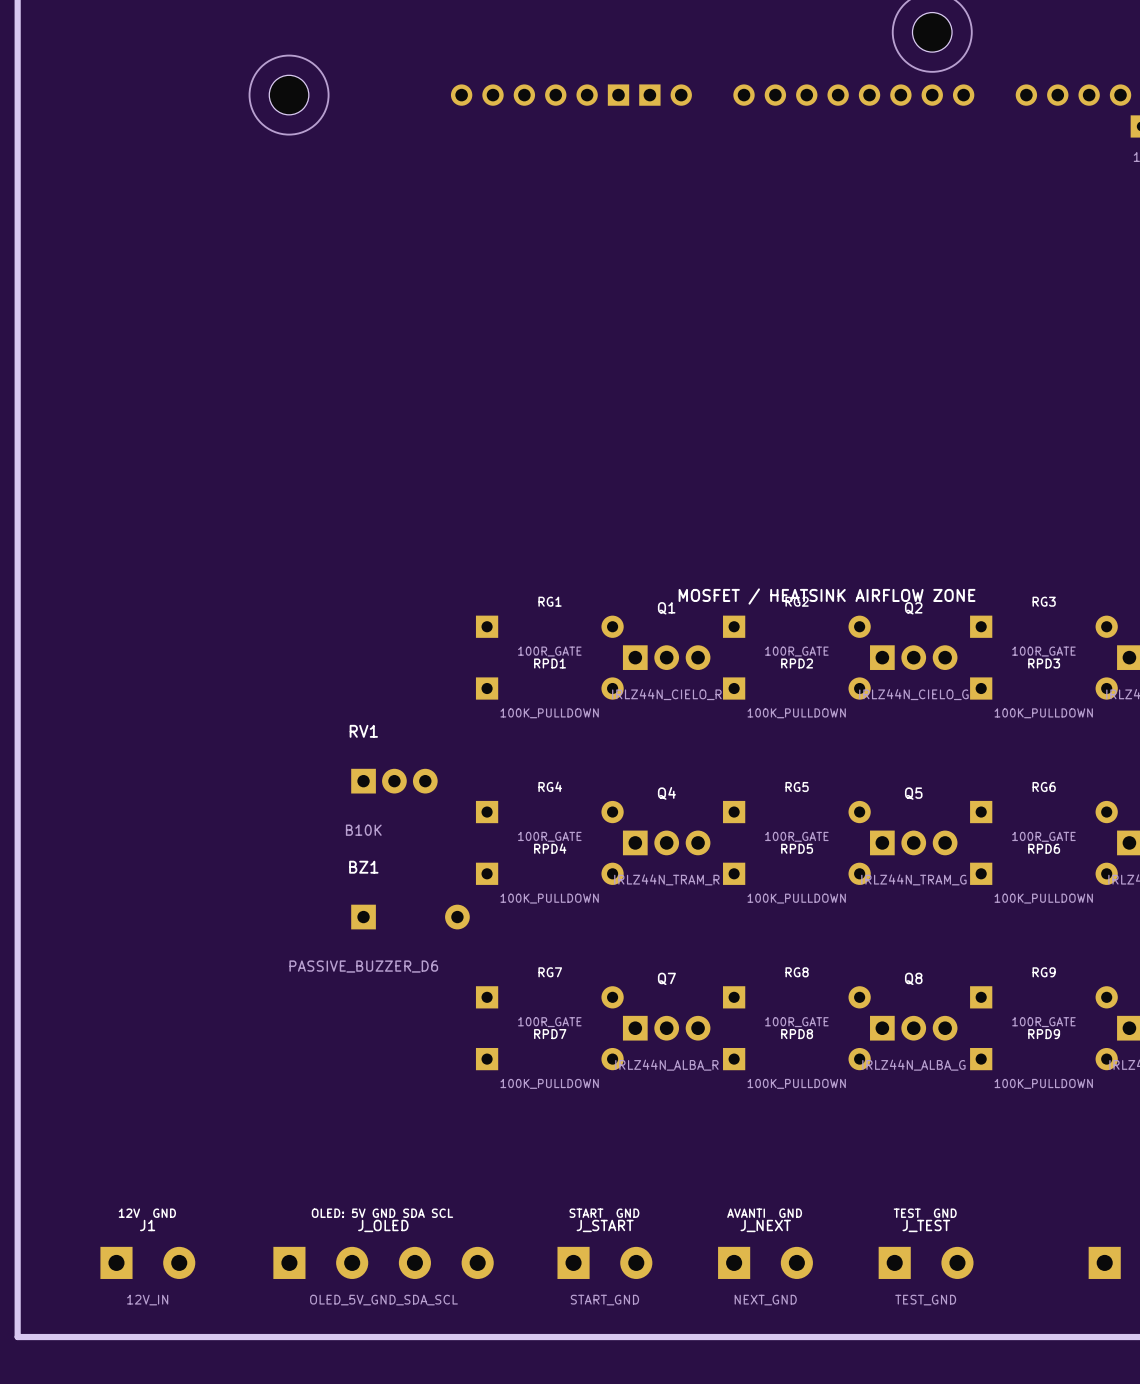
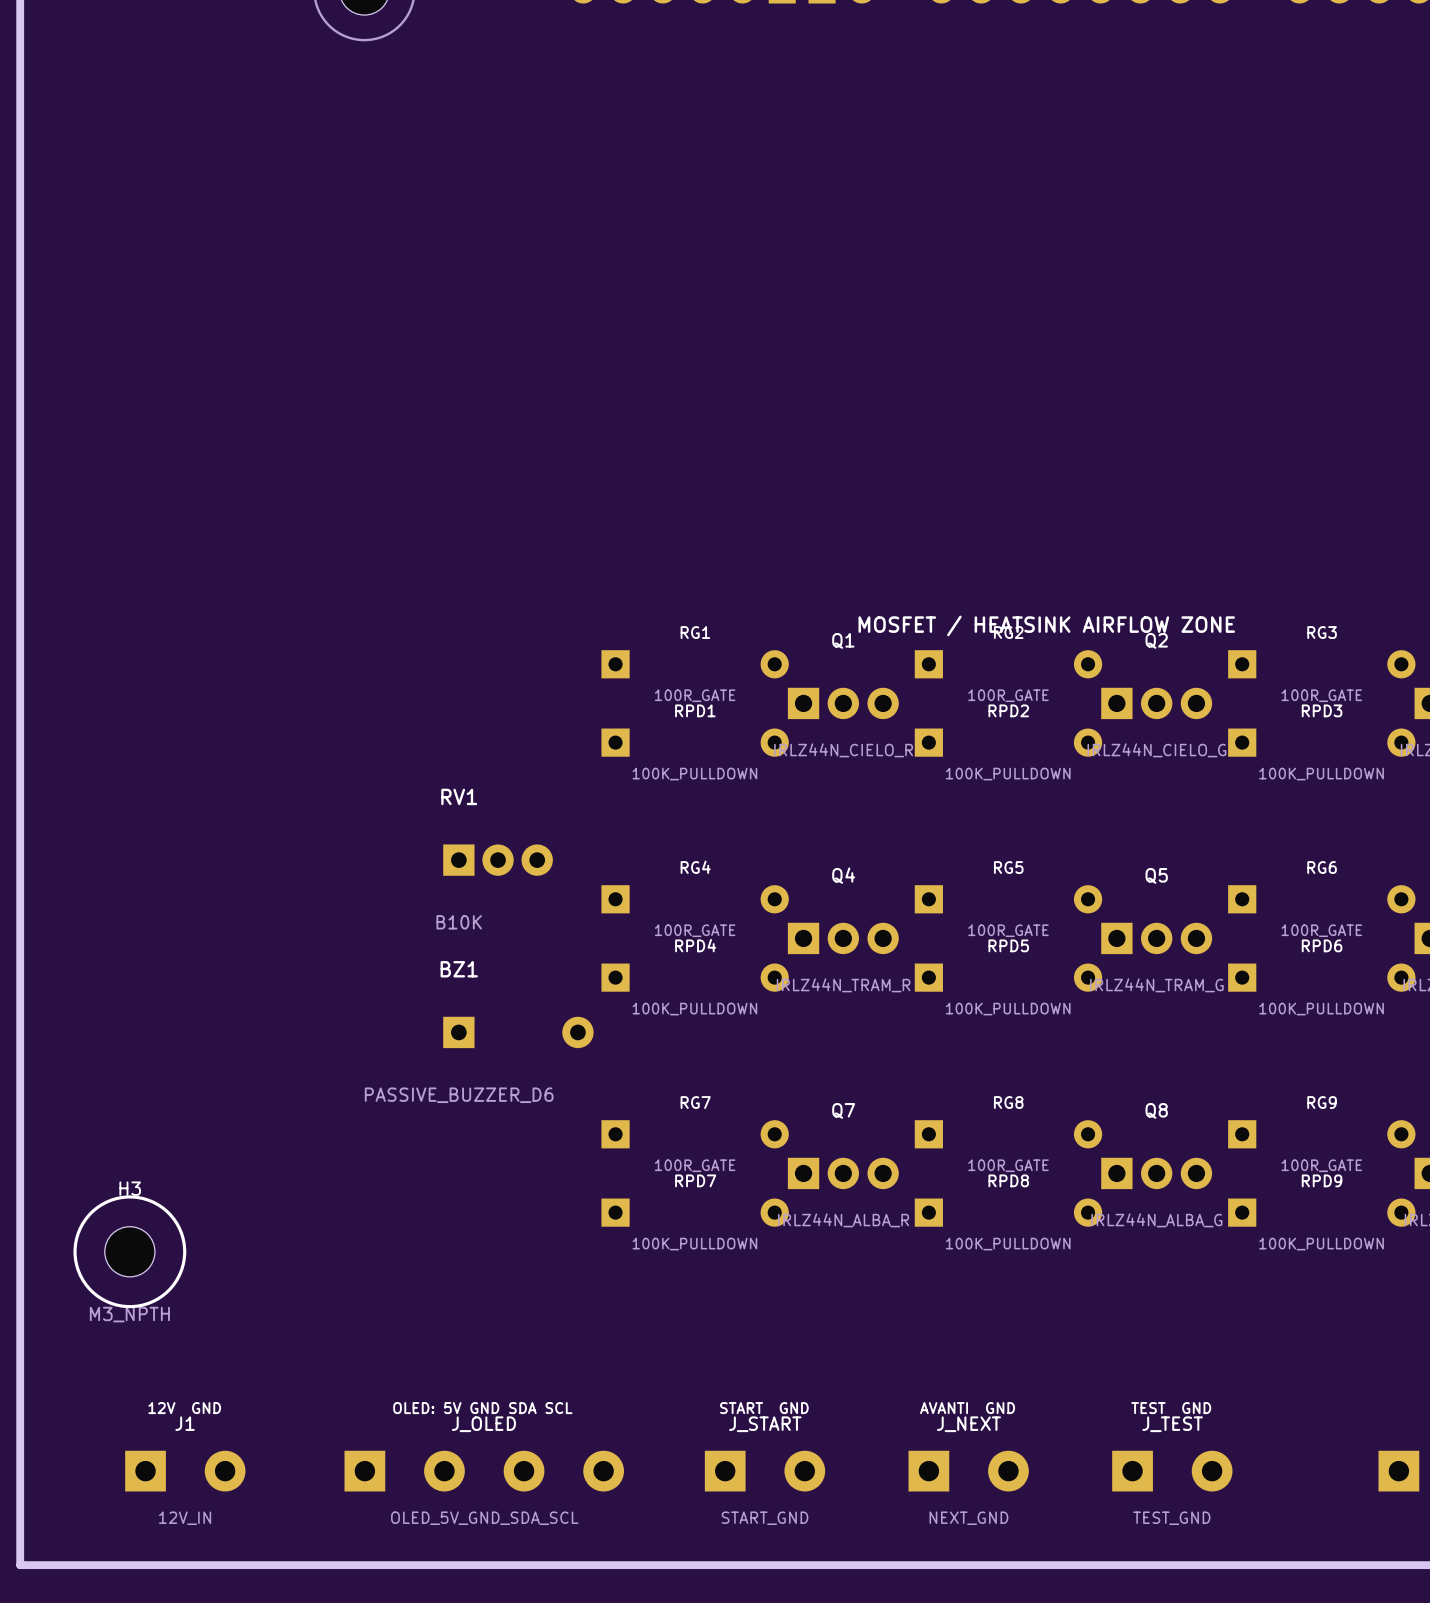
H3: none -> M3_NPTH (129, 1251)

